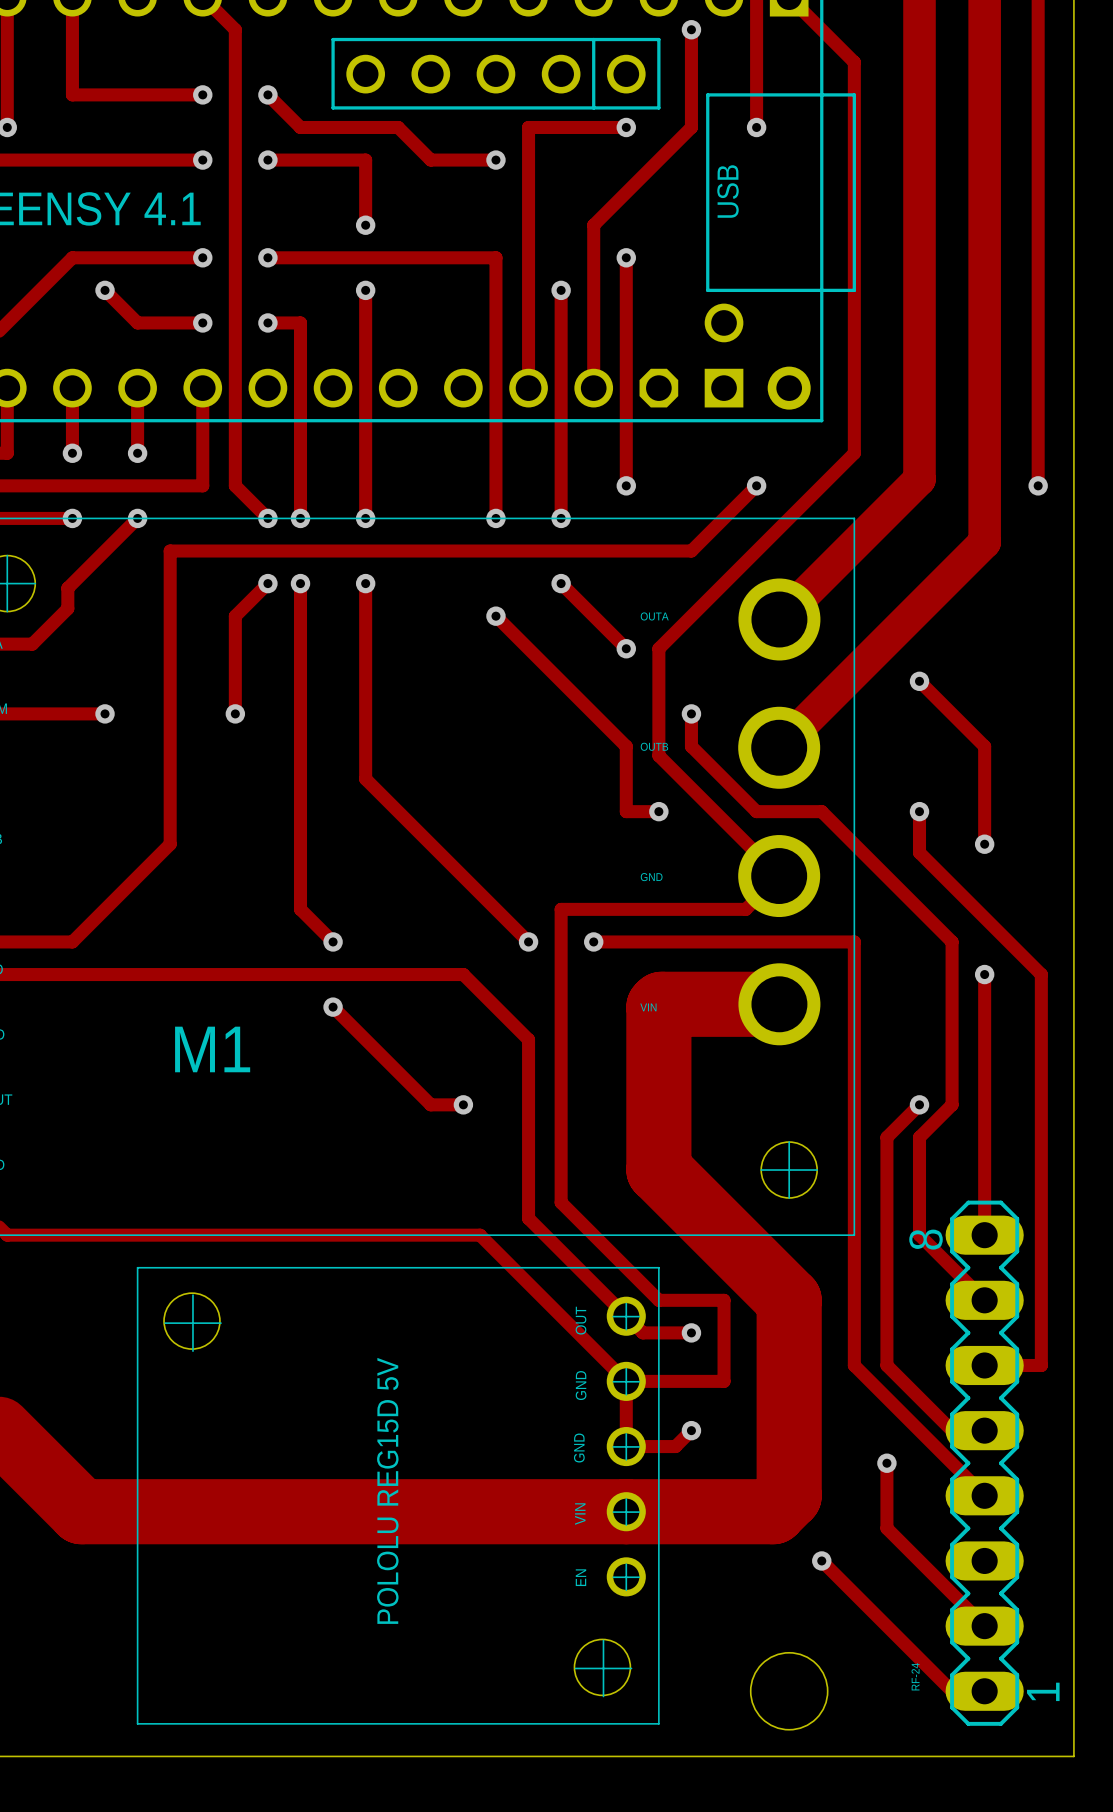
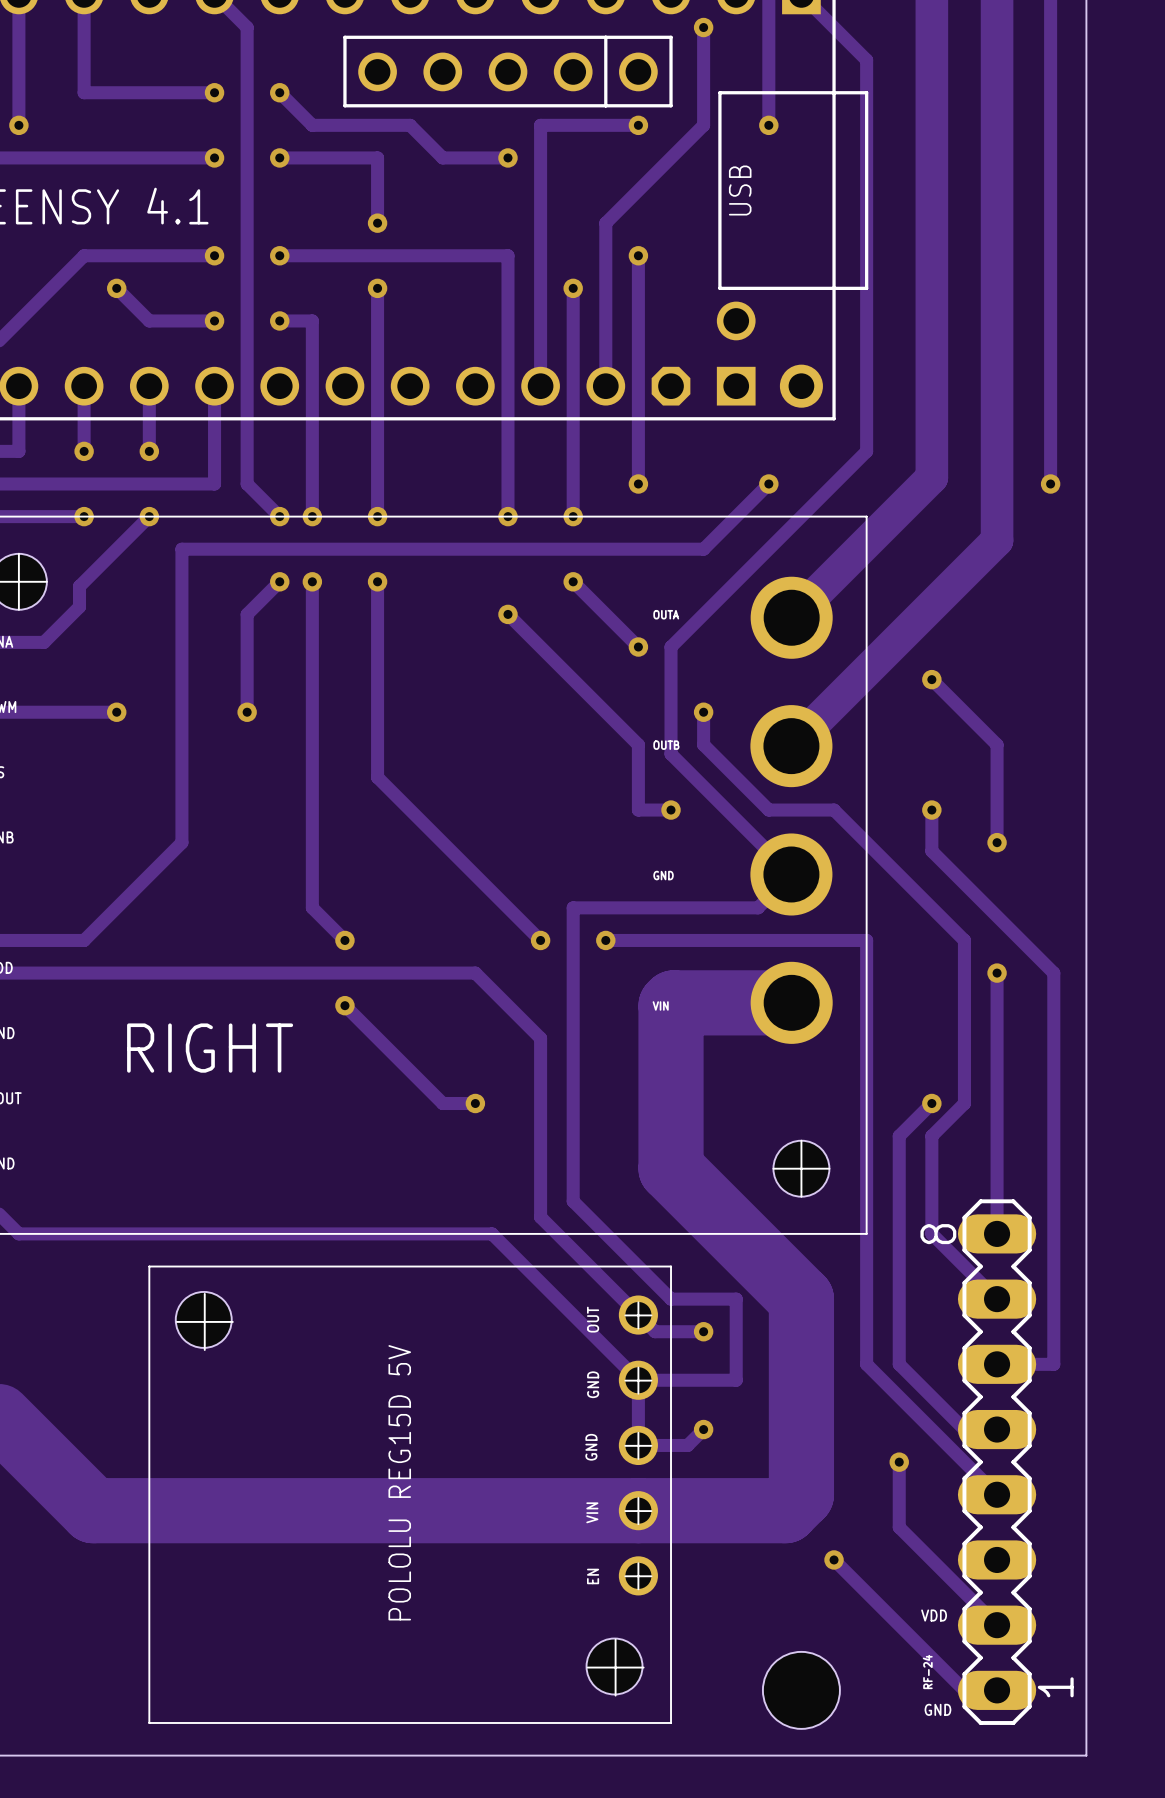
text: none -> RIGHT (210, 1048)
text: M1 (212, 1049) -> none
text: none -> VDD (934, 1615)
text: none -> GND (937, 1709)

